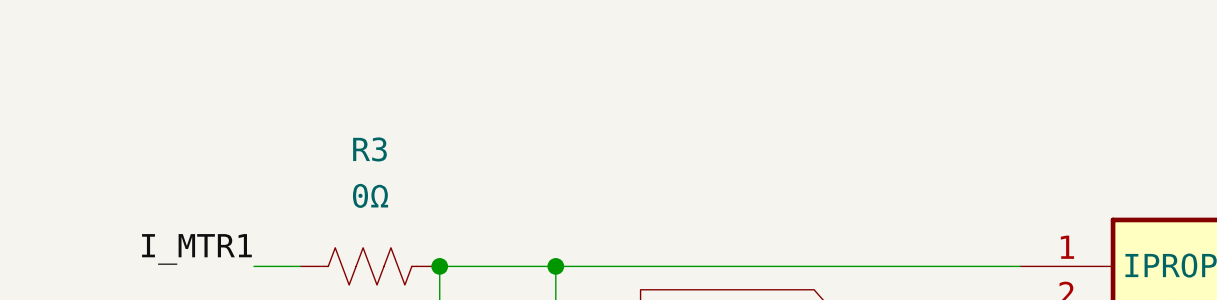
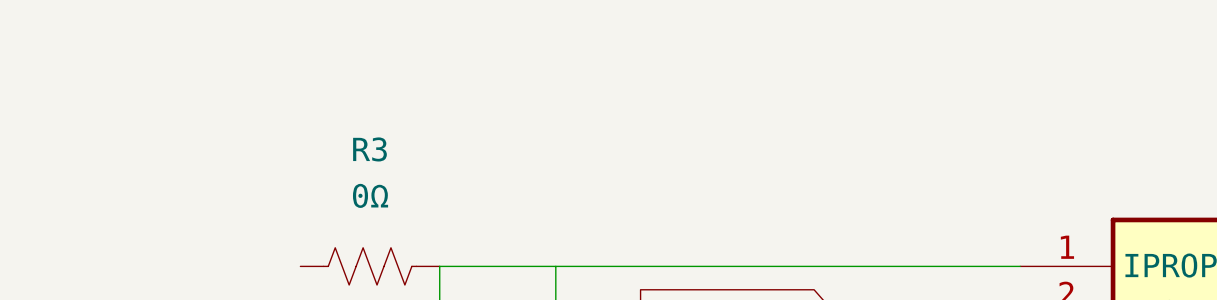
label: I_MTR1 (196, 249) -> none
wire: (253, 266) (300, 266) -> none
junction: (439, 266) -> none
junction: (555, 266) -> none

